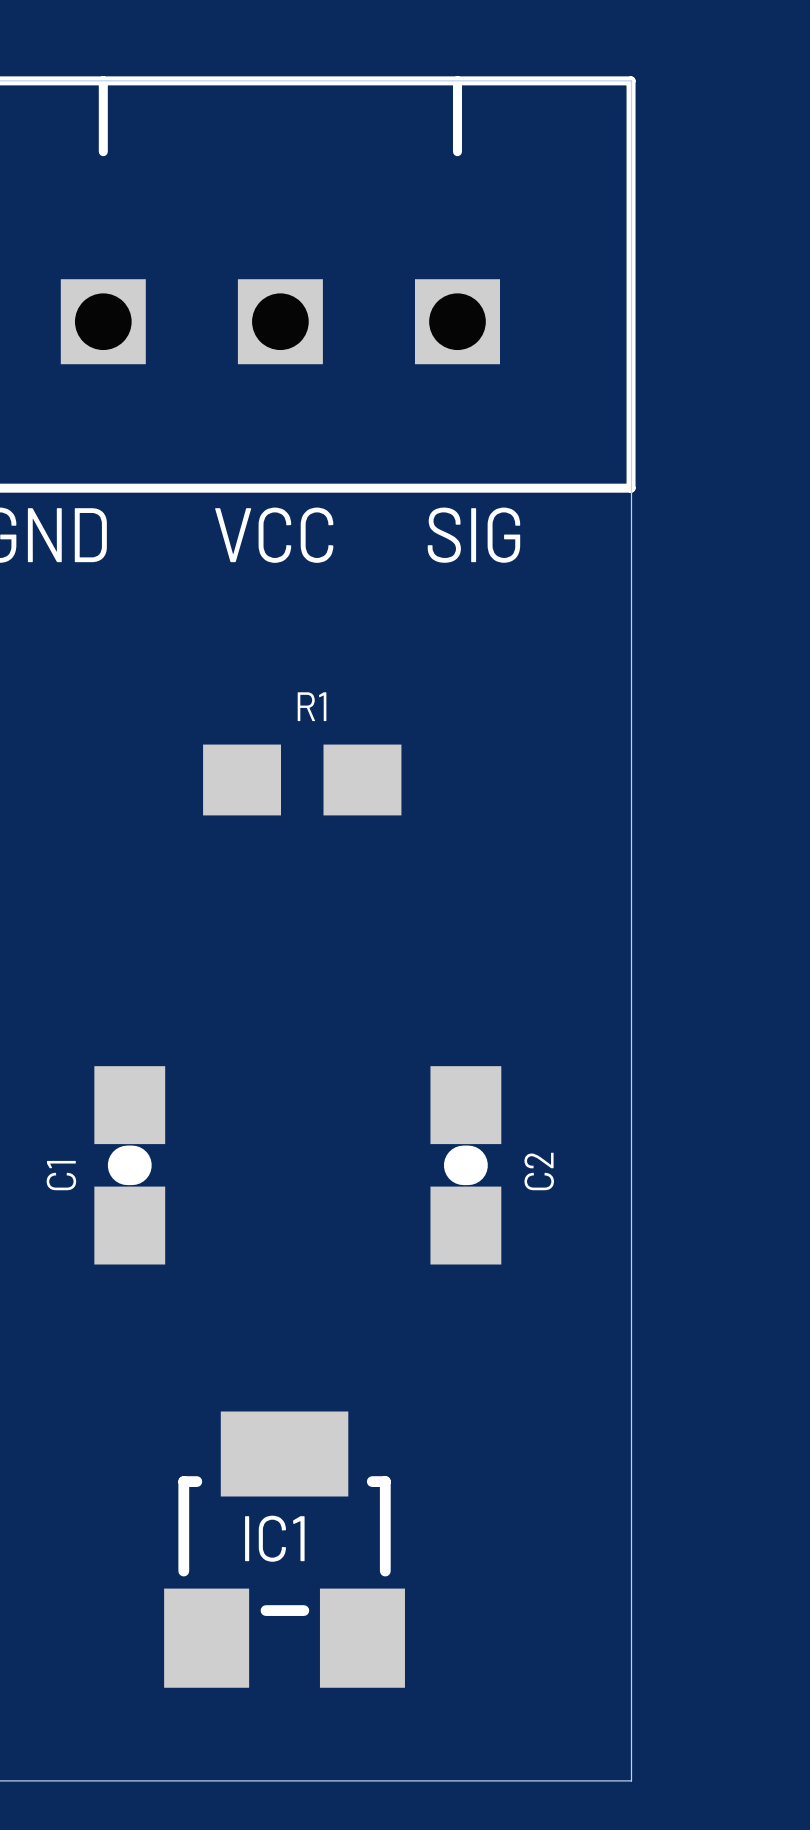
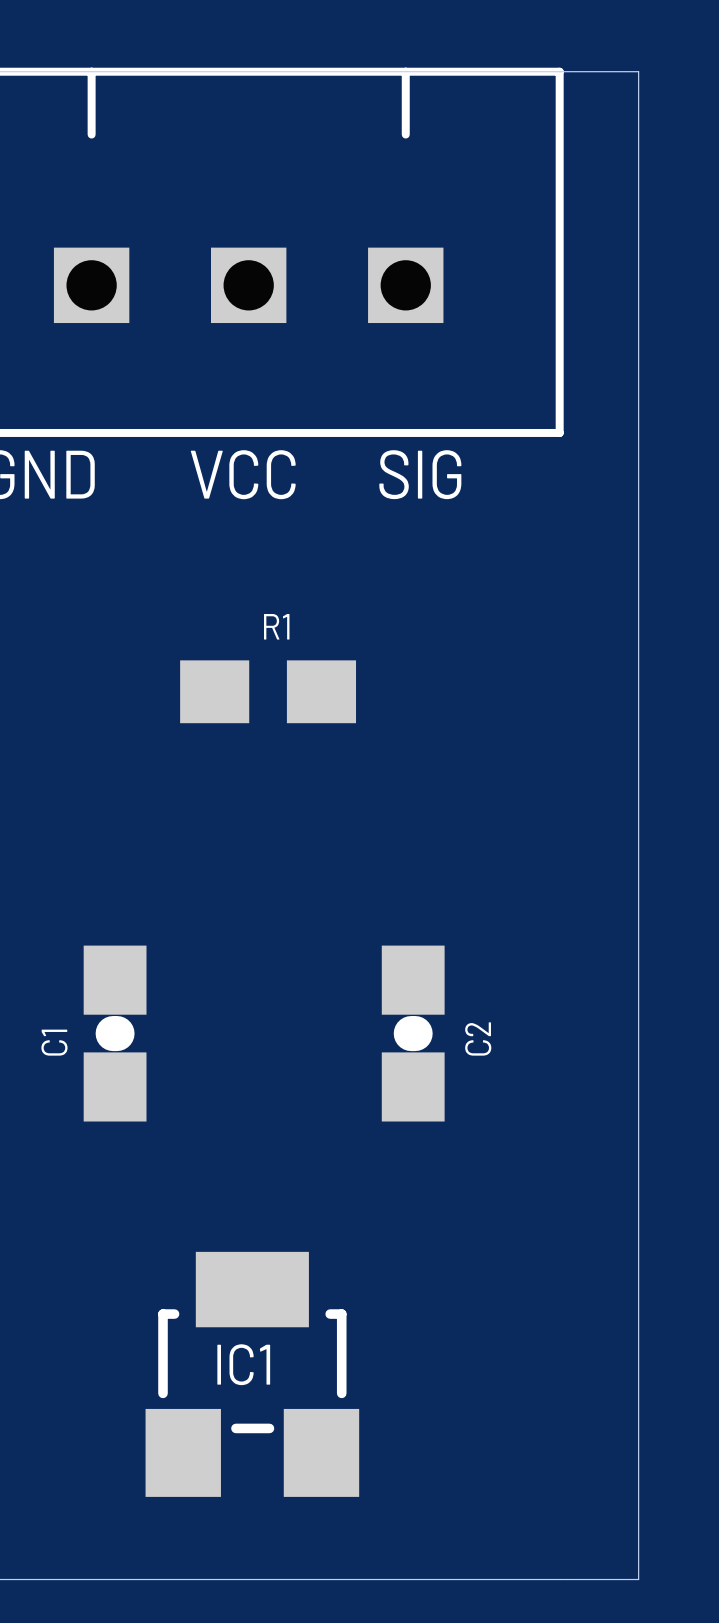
board edge: (631, 80) (631, 1780) -> (560, 71) (638, 71) (638, 1579) (560, 1579)

